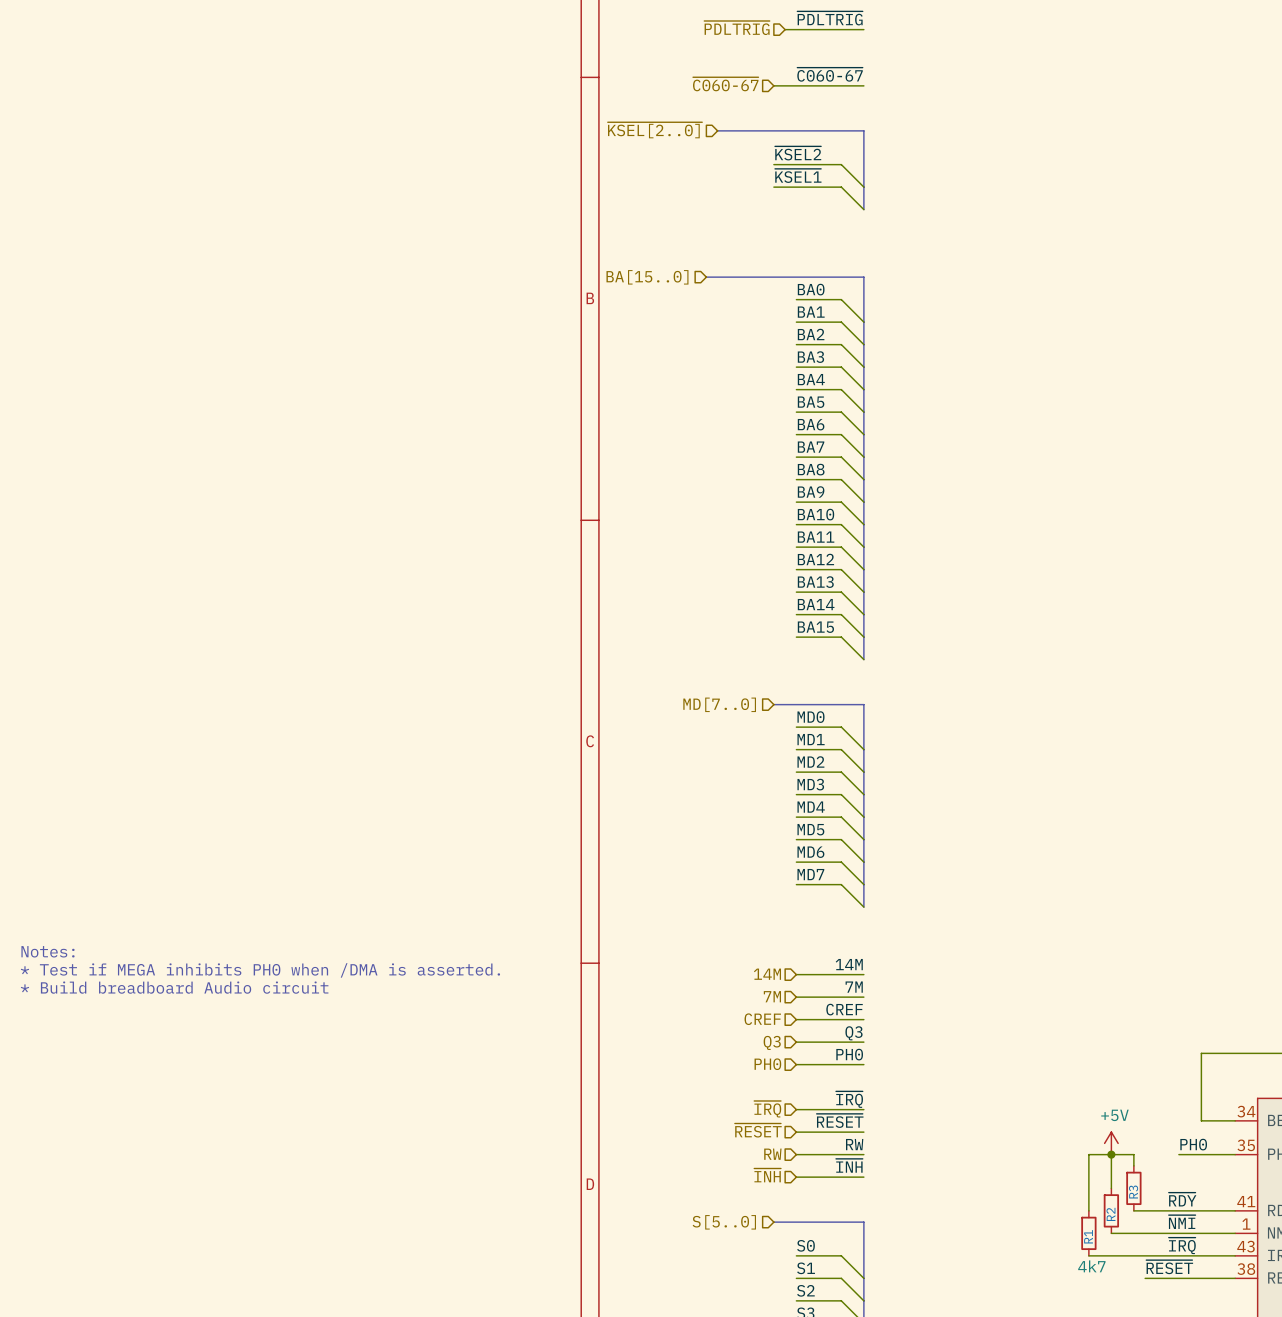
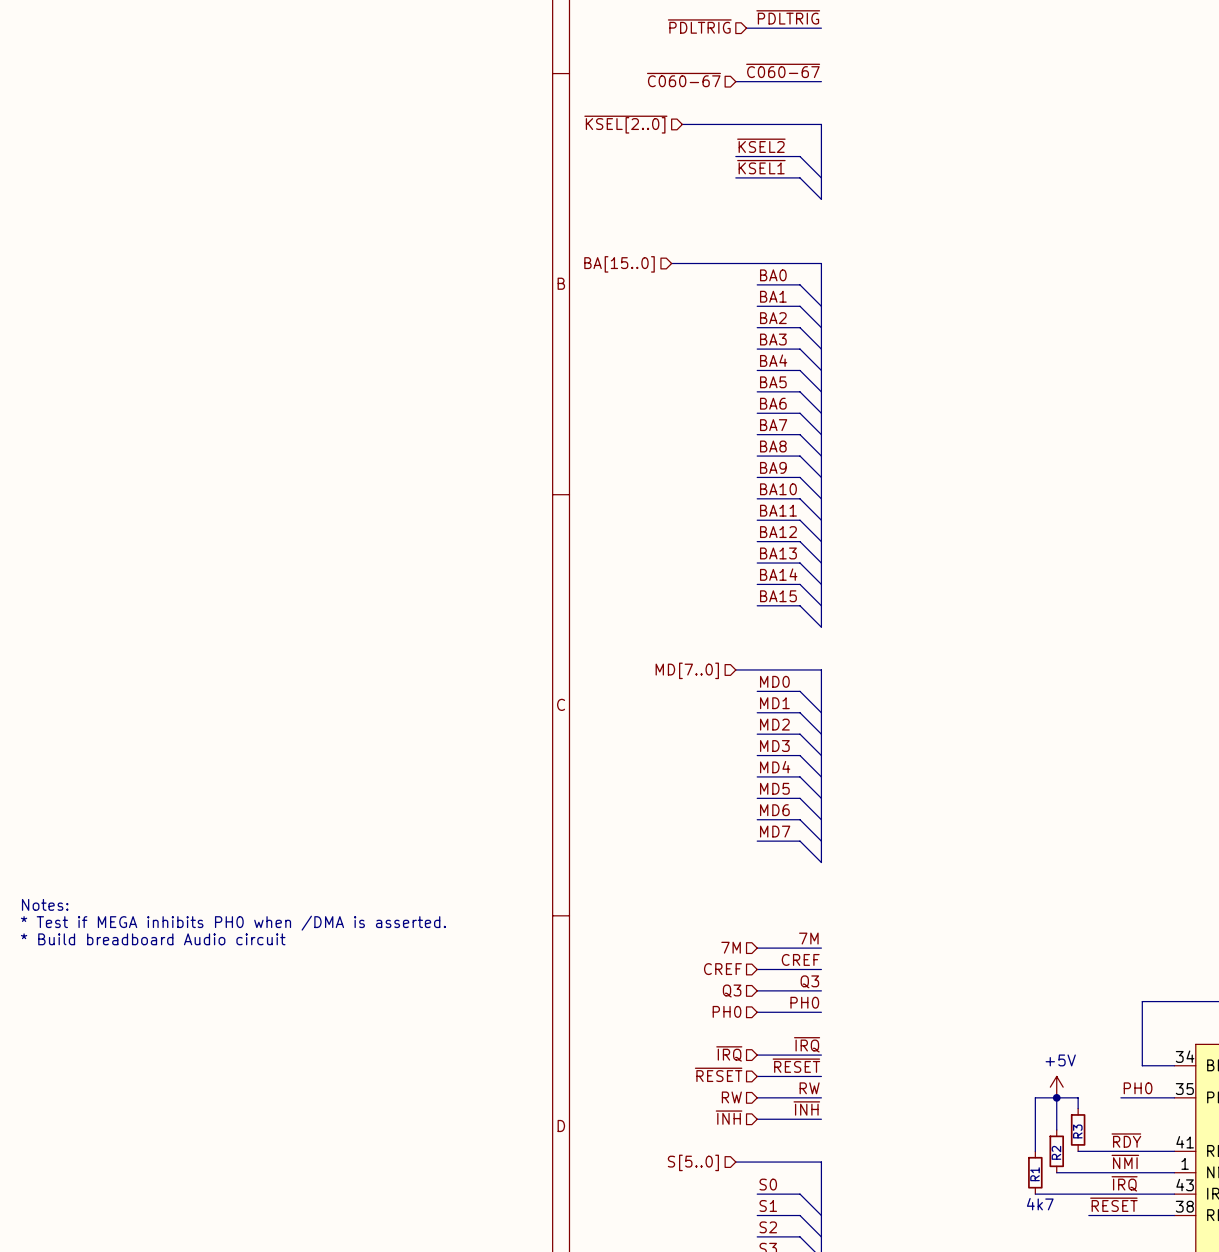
label: 14M (849, 964) -> none
hierarchical label: 14M (767, 974) -> none
wire: (796, 974) (863, 974) -> none

